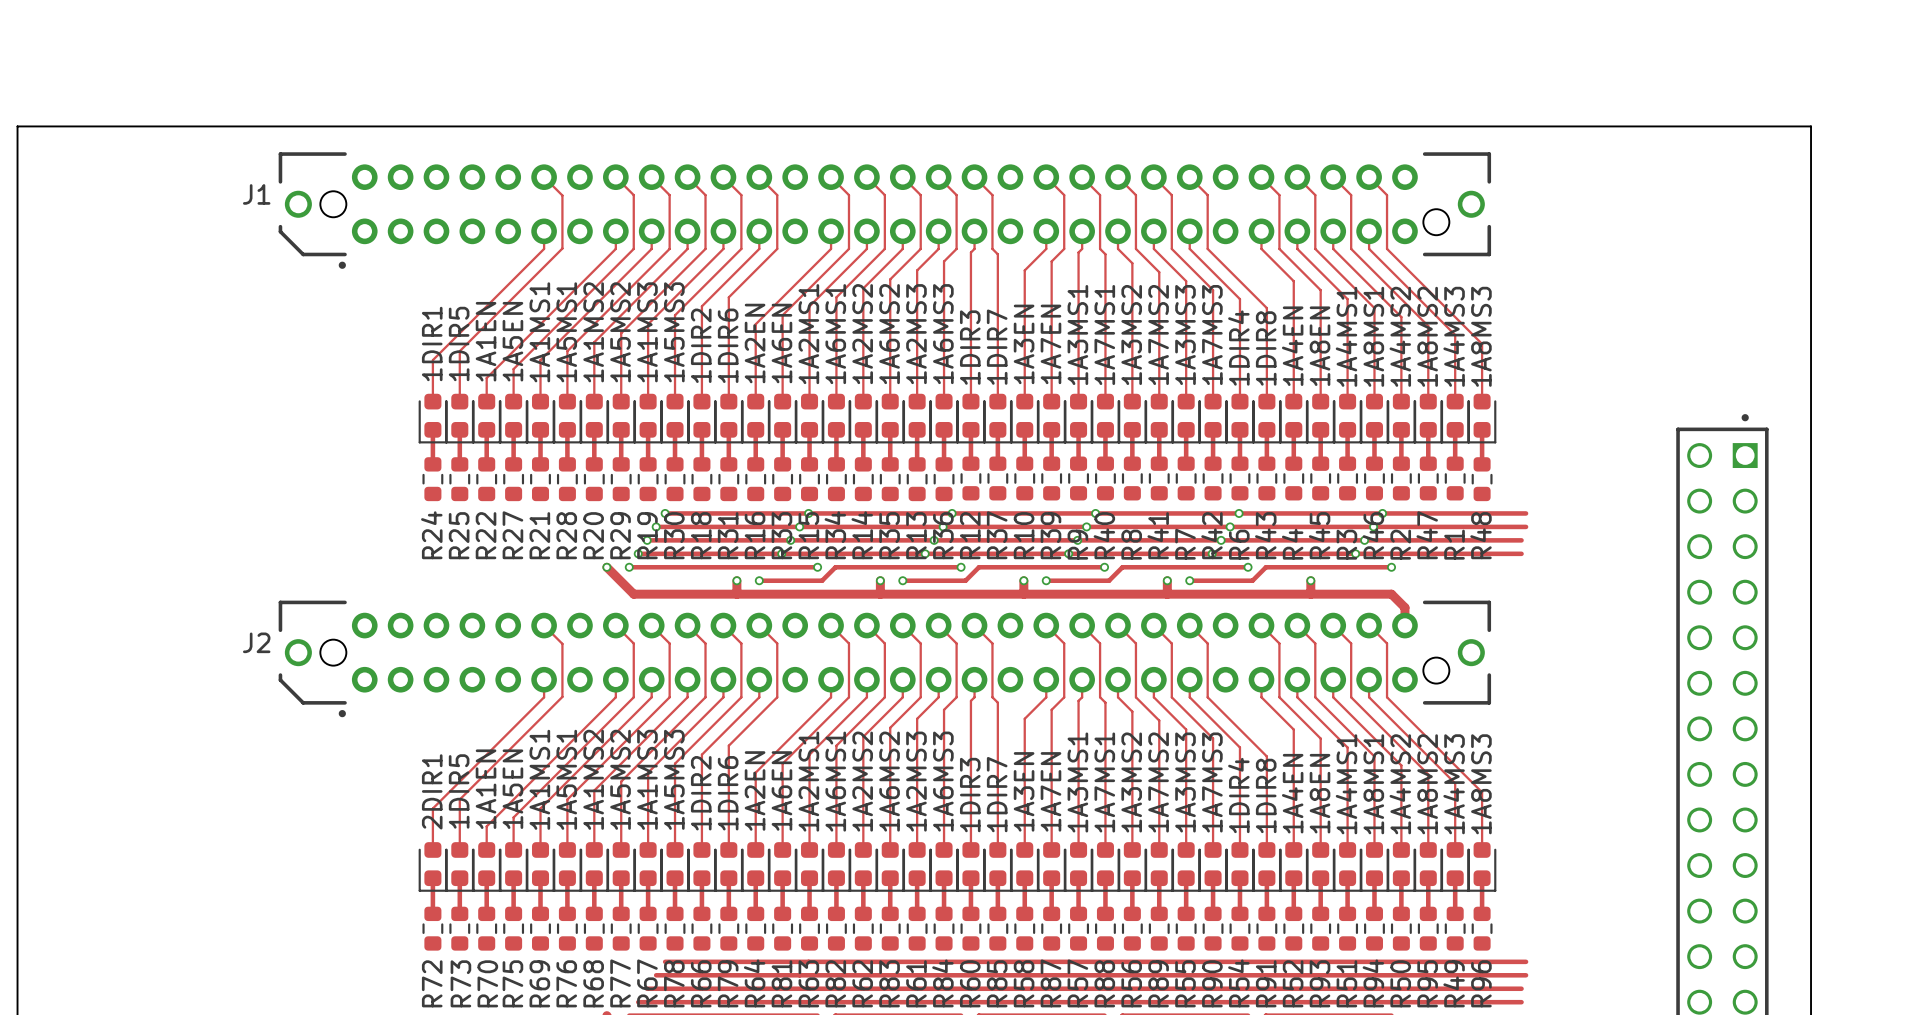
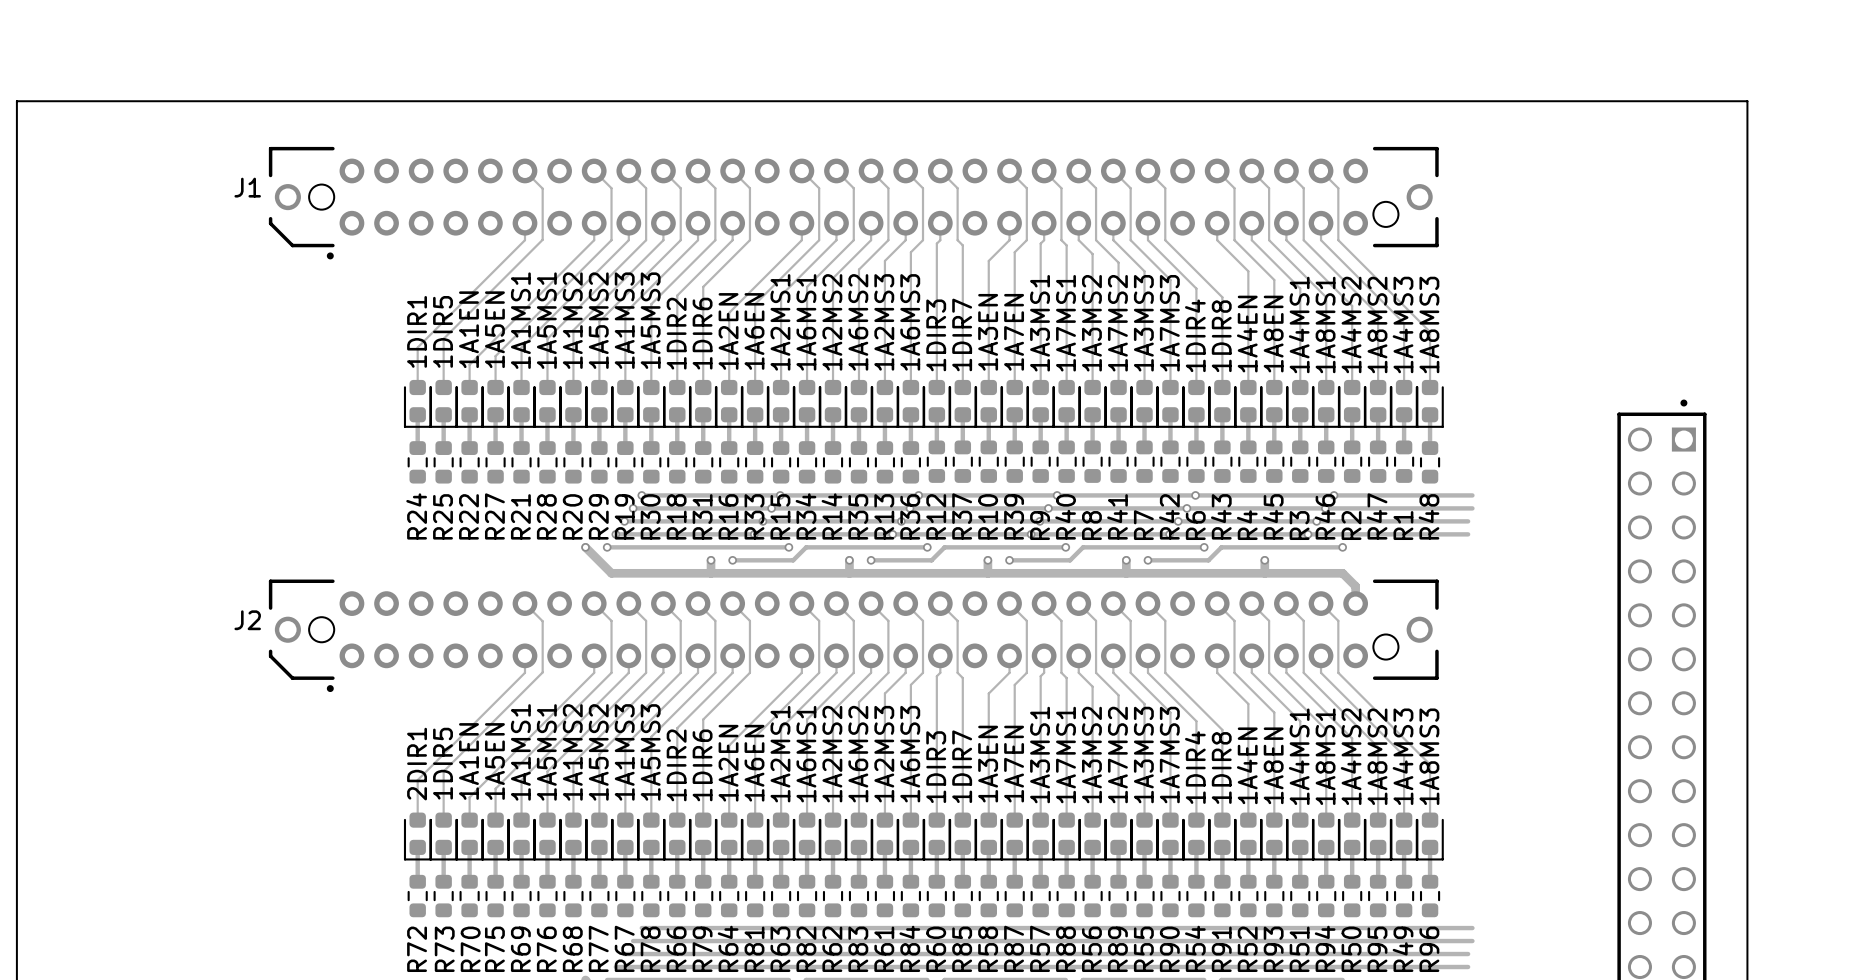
board edge: (17, 126) (1811, 126) -> (16, 121) (16, 101) (1747, 101) (1747, 121)

